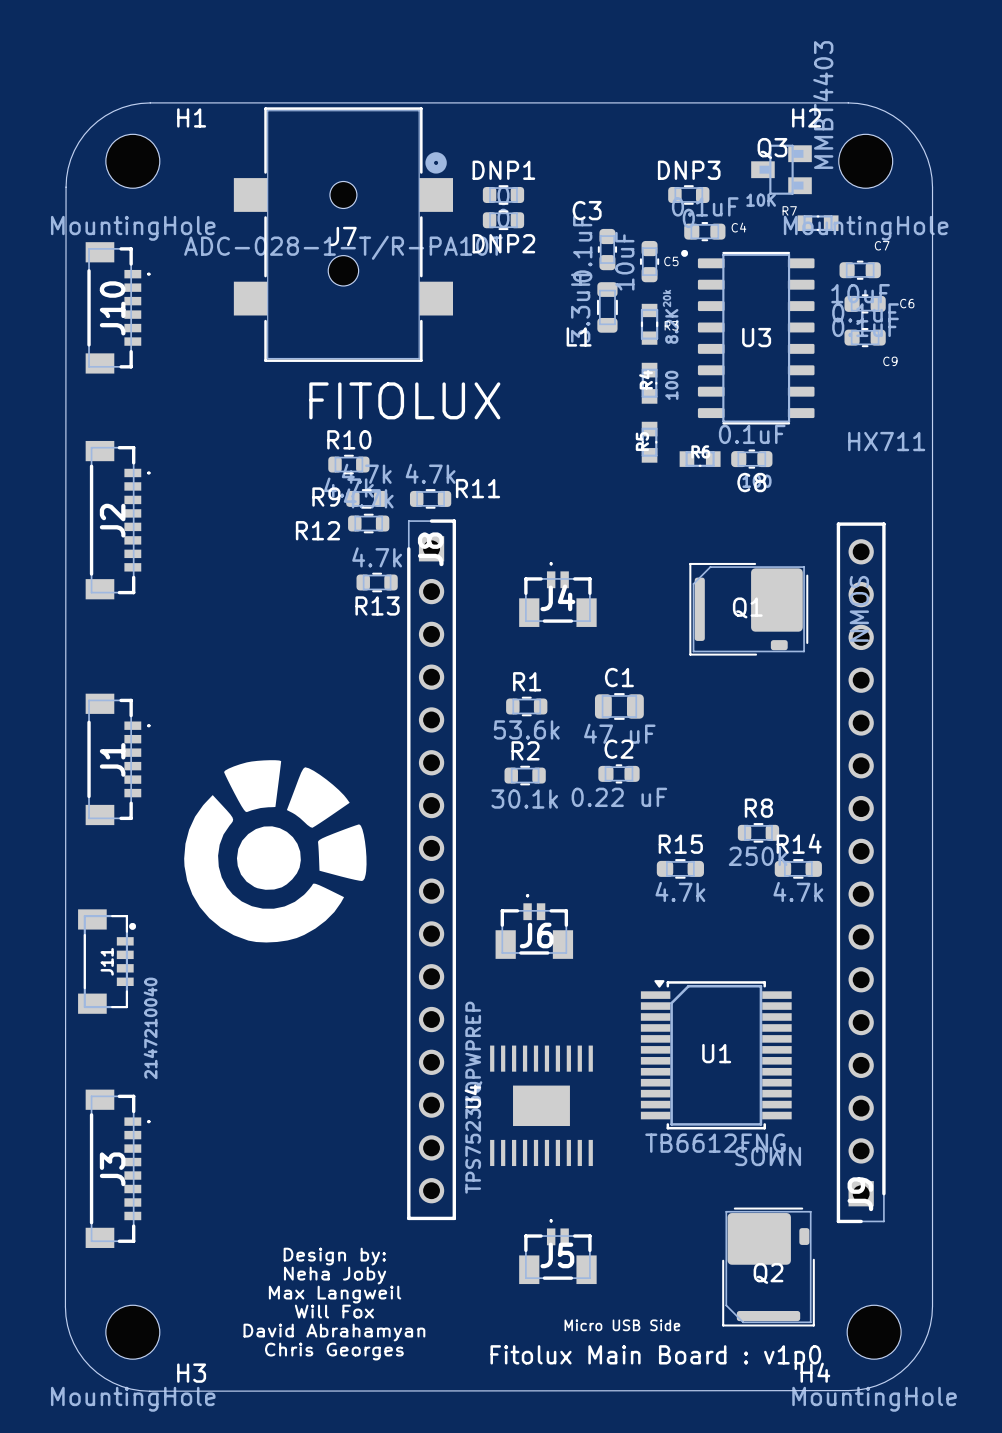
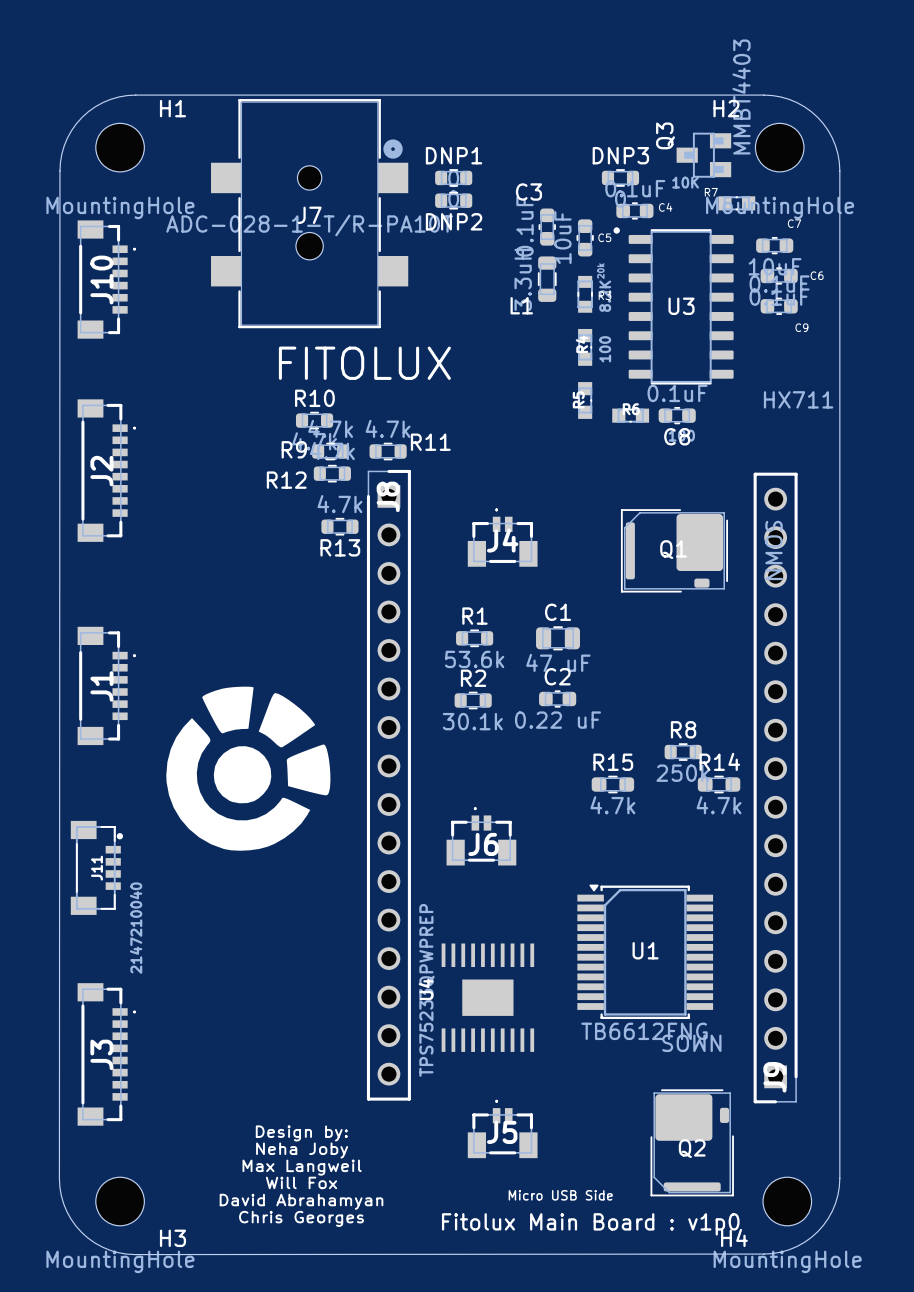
Q3 name rotation: 0° (772, 148) -> 90° counterclockwise (665, 135)

